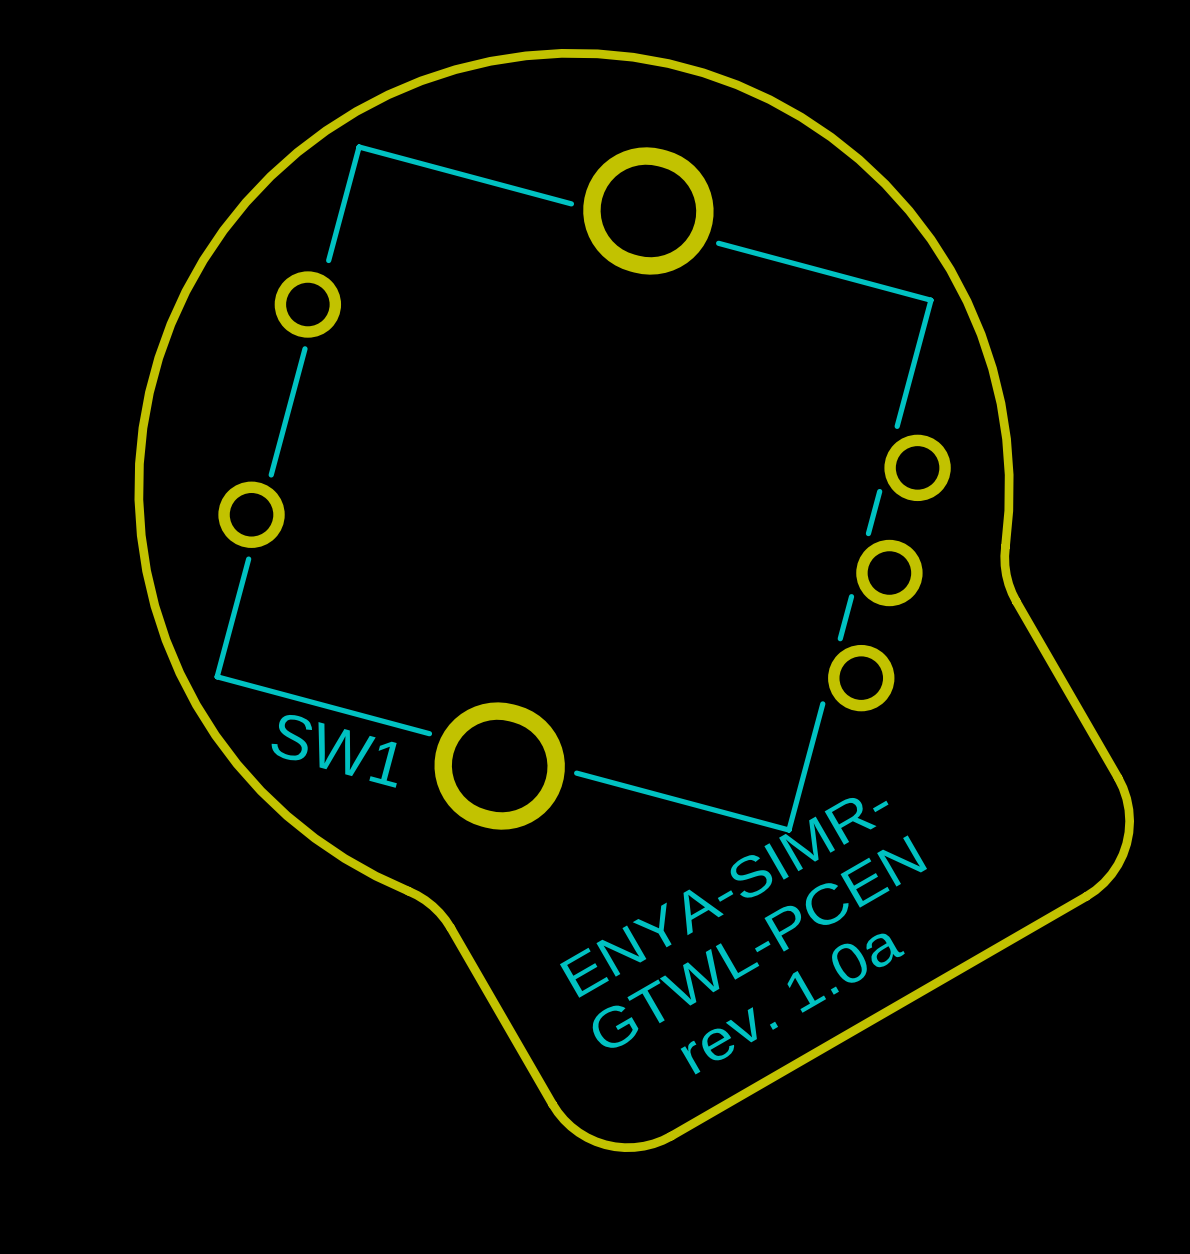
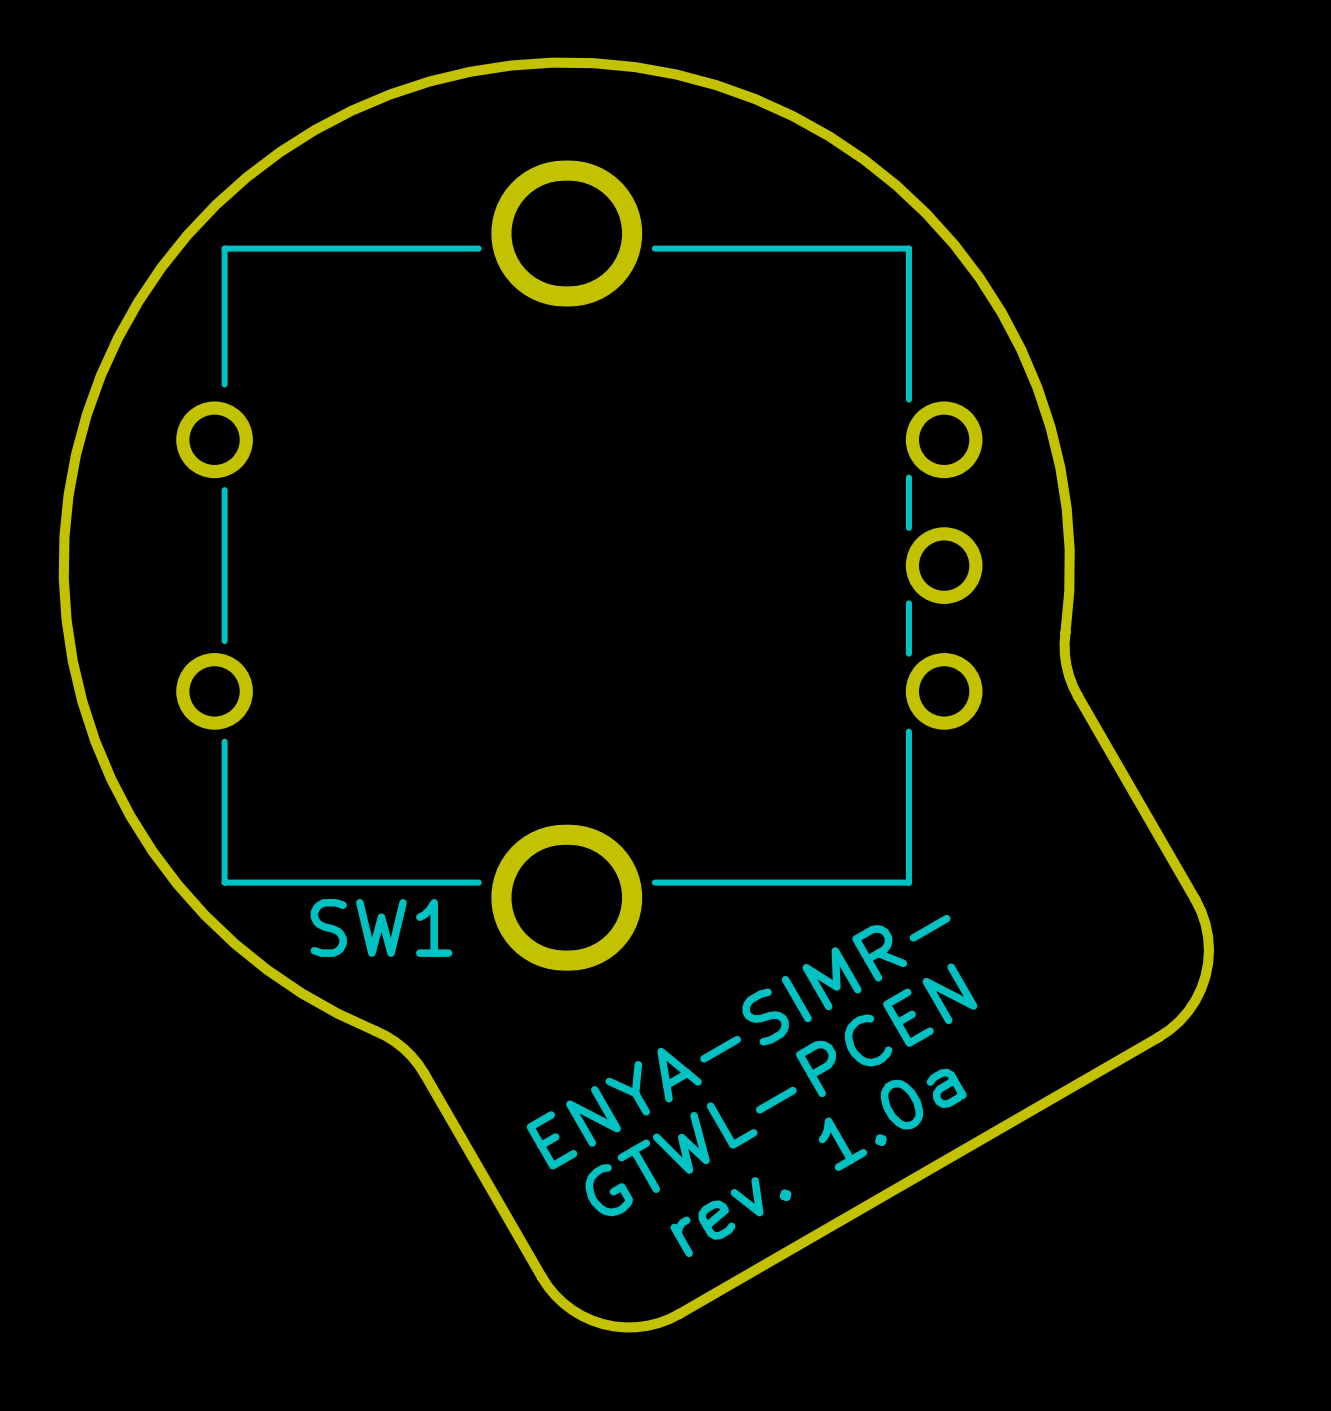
SW1 rotation: 0° (582, 488) -> 15° counterclockwise (579, 565)

